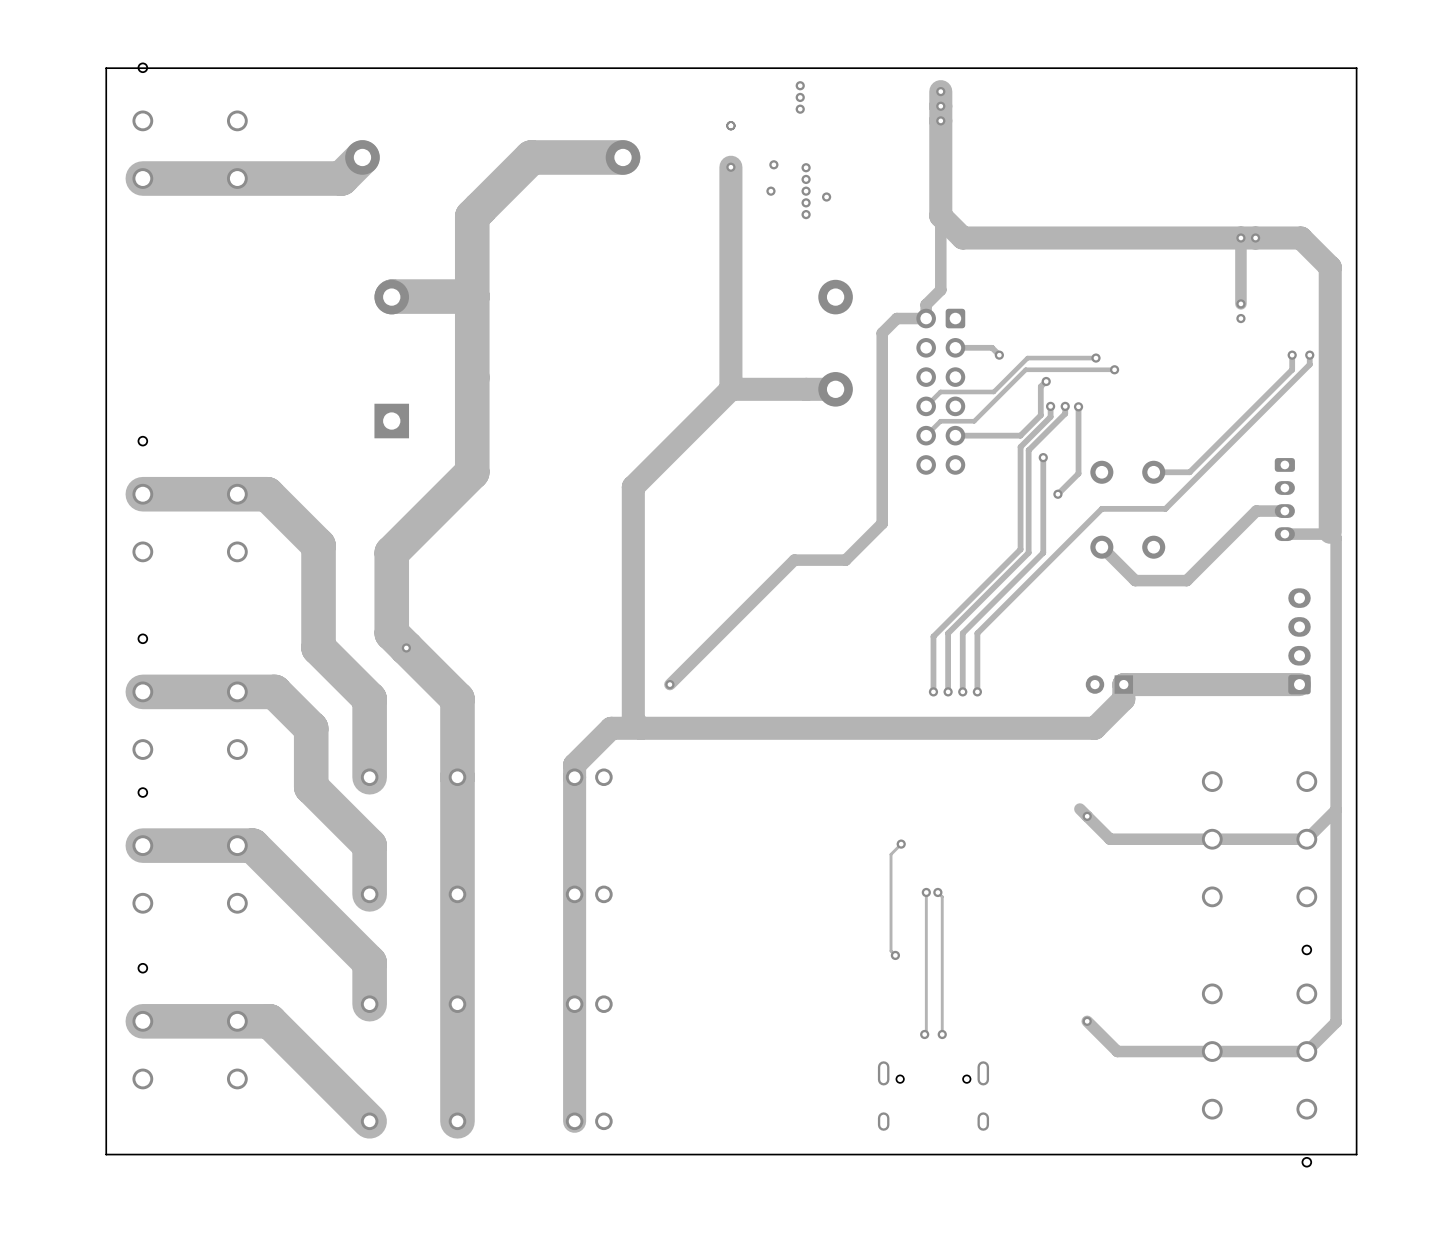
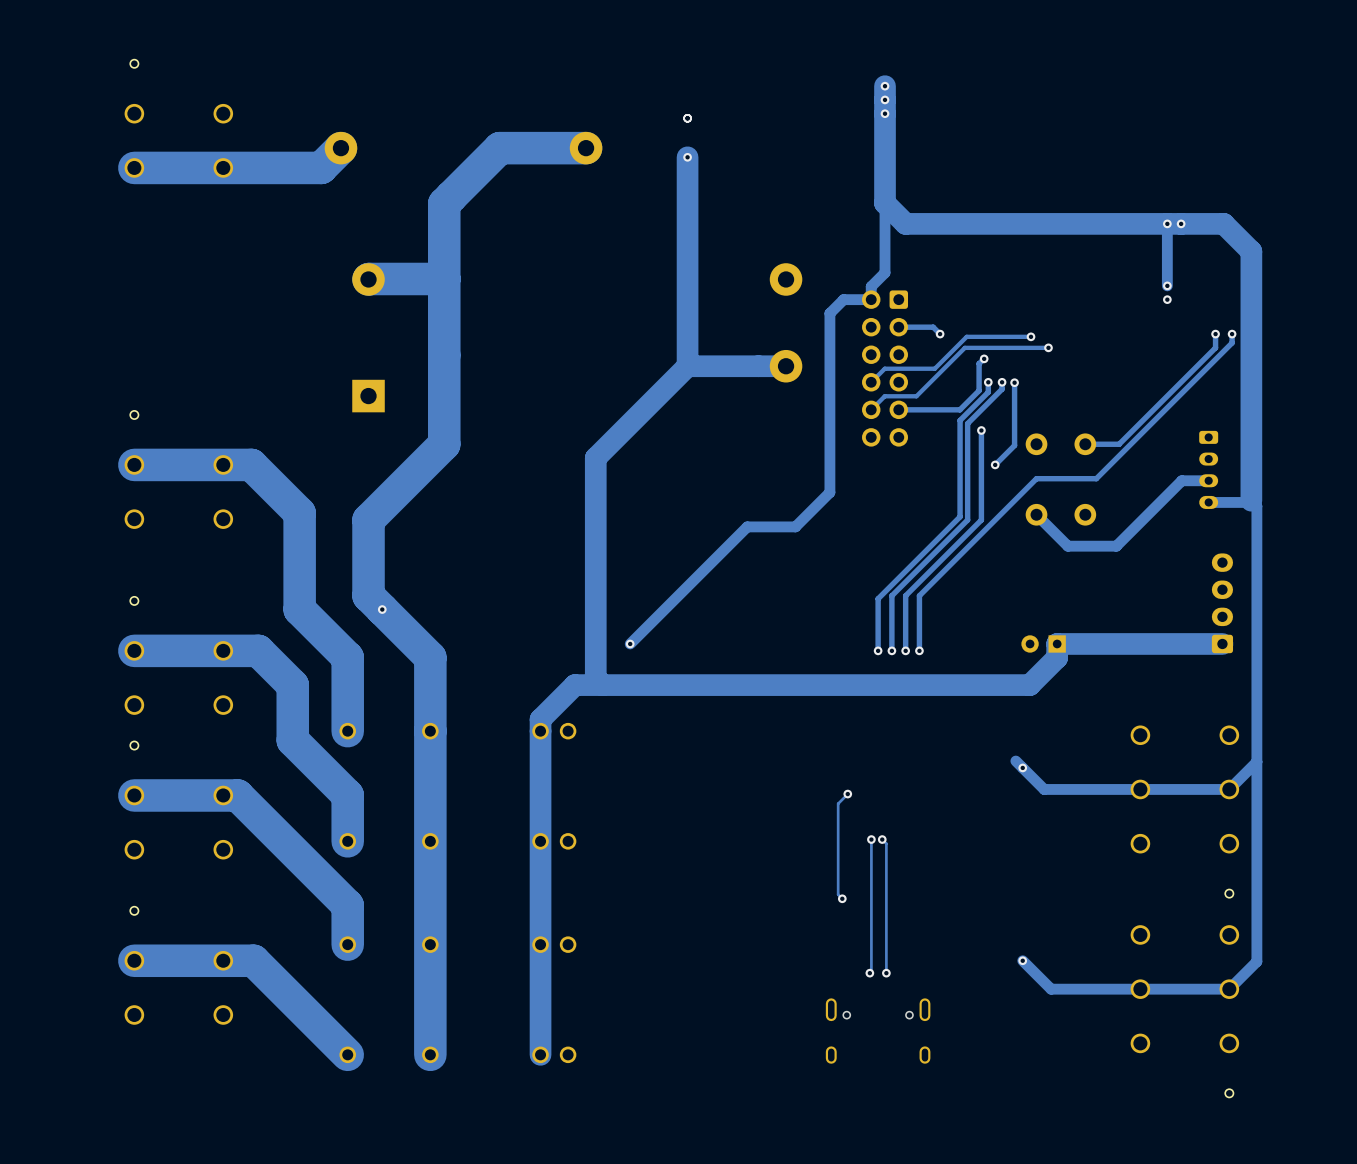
board edge: (1356, 68) (1356, 1154) (106, 1154) (106, 68) (1356, 68) -> none
via: (800, 85) -> none
via: (800, 97) -> none
via: (800, 109) -> none
via: (773, 164) -> none
via: (806, 167) -> none
via: (806, 179) -> none
via: (770, 191) -> none
via: (806, 191) -> none
via: (826, 197) -> none
via: (806, 202) -> none
via: (806, 214) -> none

